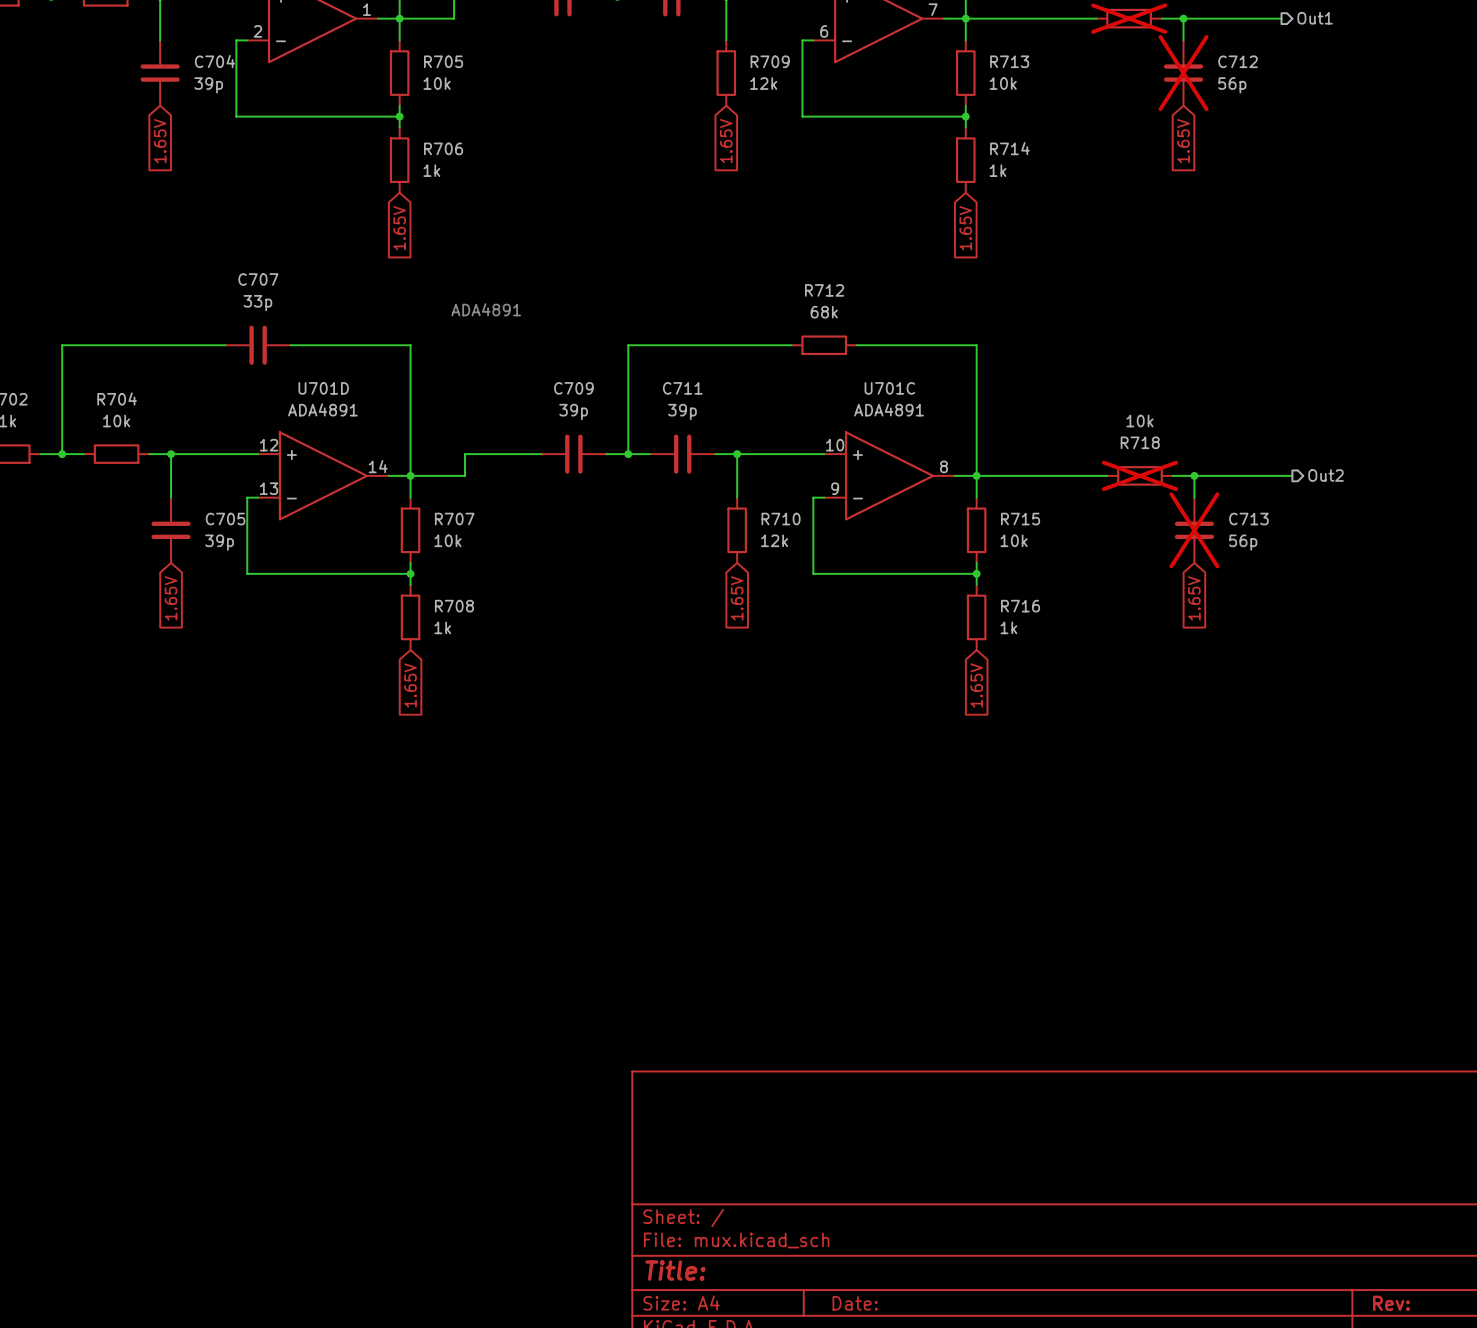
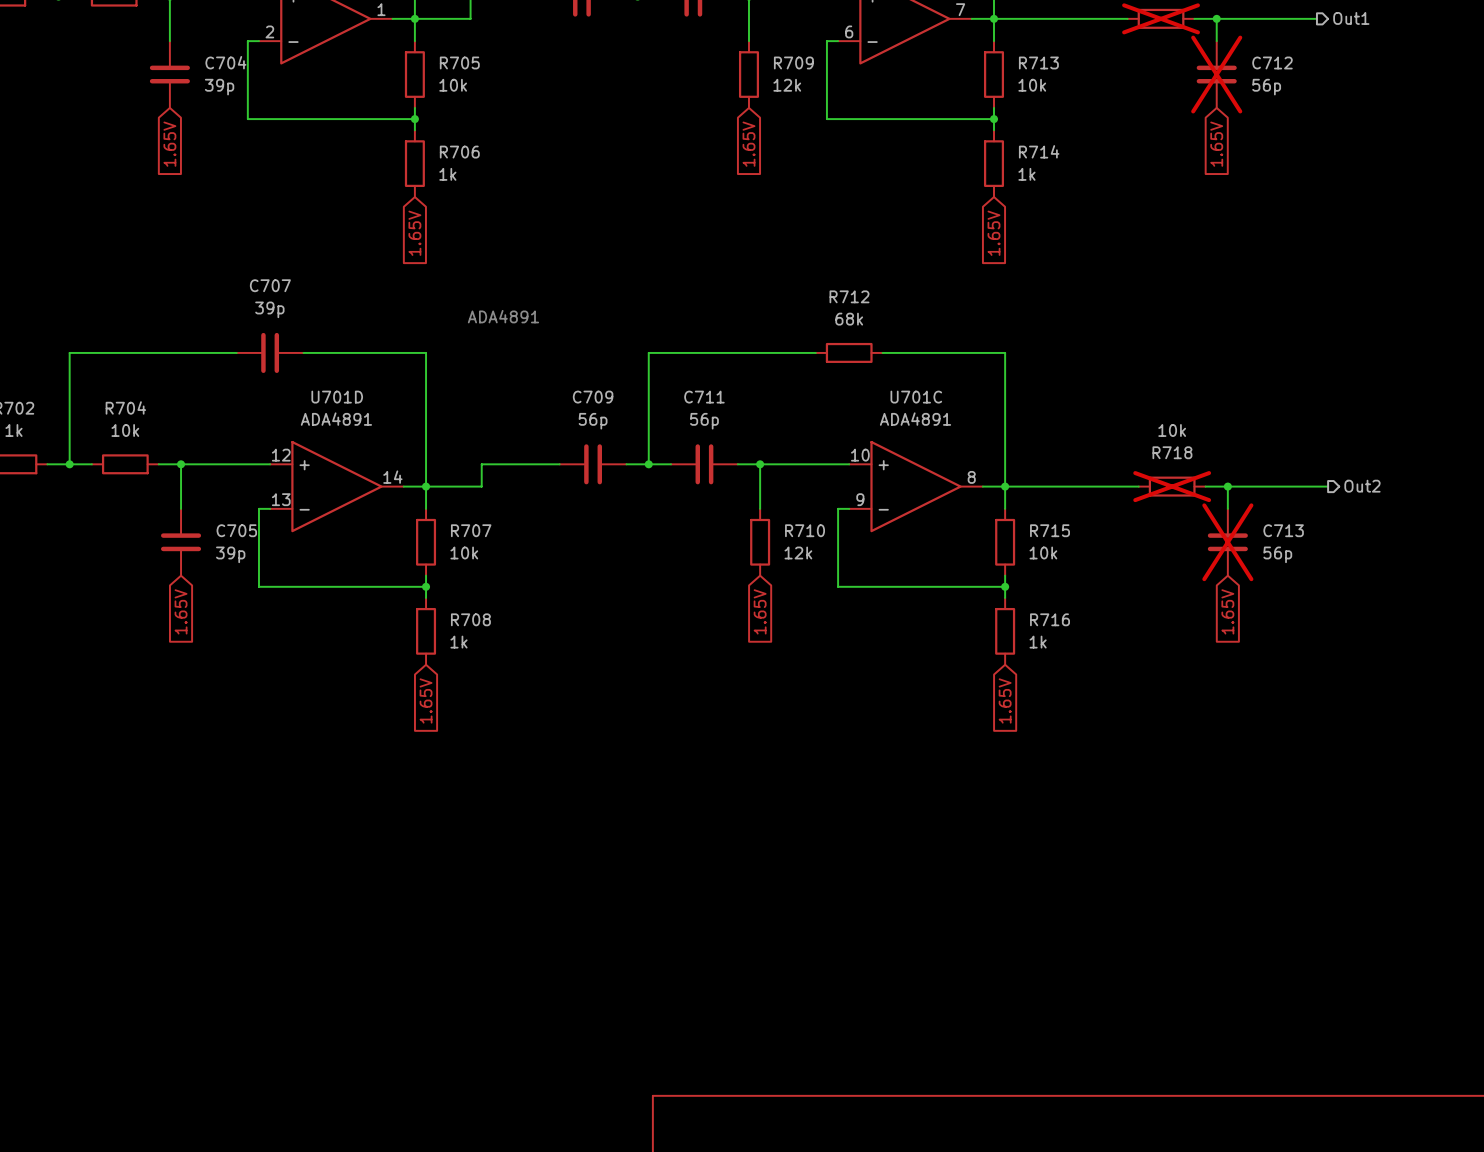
C707 value: 33p (257, 303) -> 39p (269, 309)
C709 value: 39p (573, 411) -> 56p (593, 421)
C711 value: 39p (682, 411) -> 56p (704, 421)

